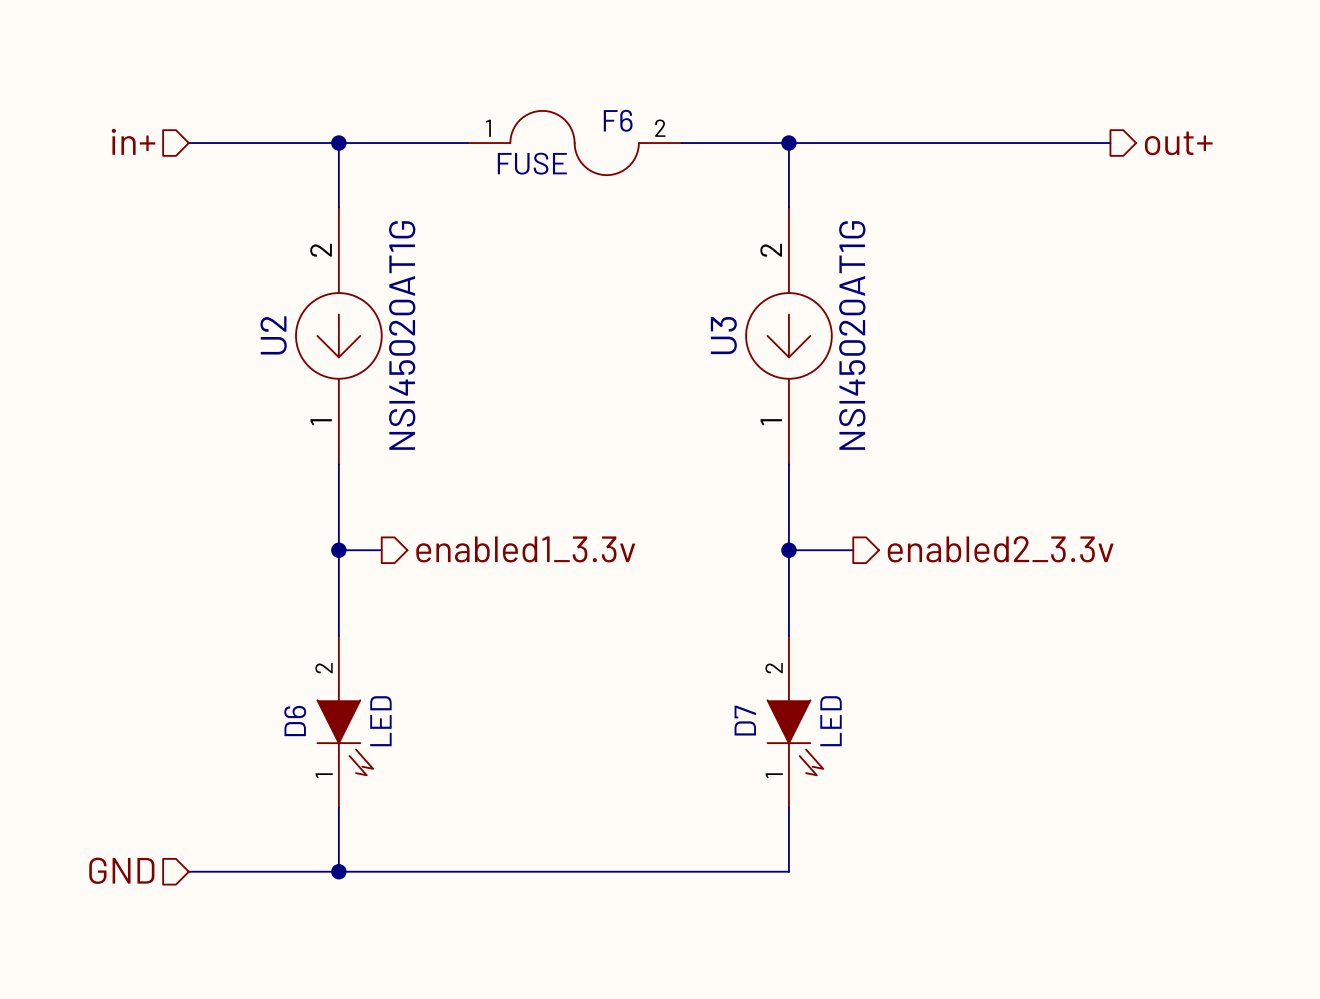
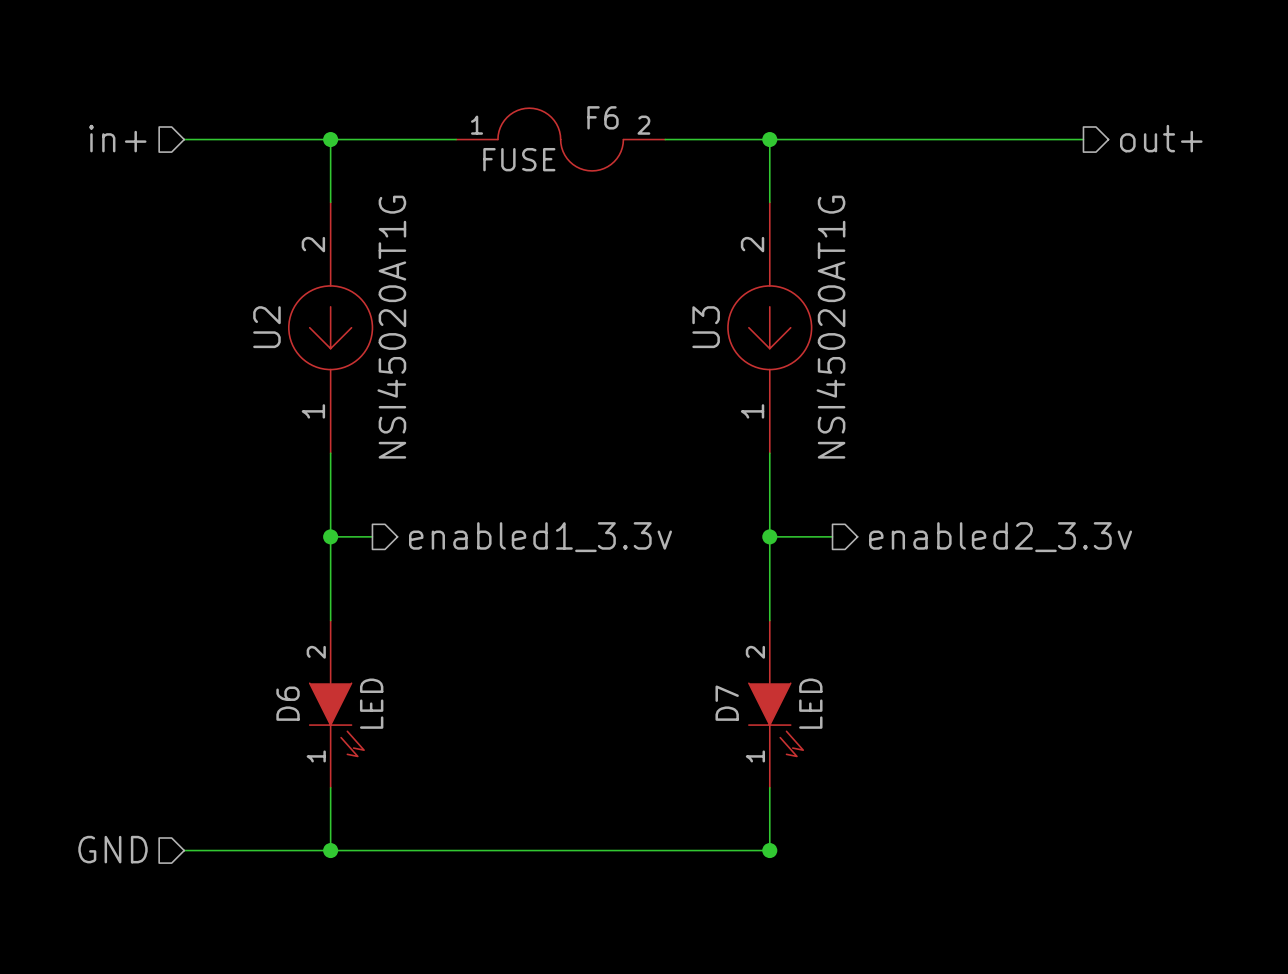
junction: none -> (769, 850)

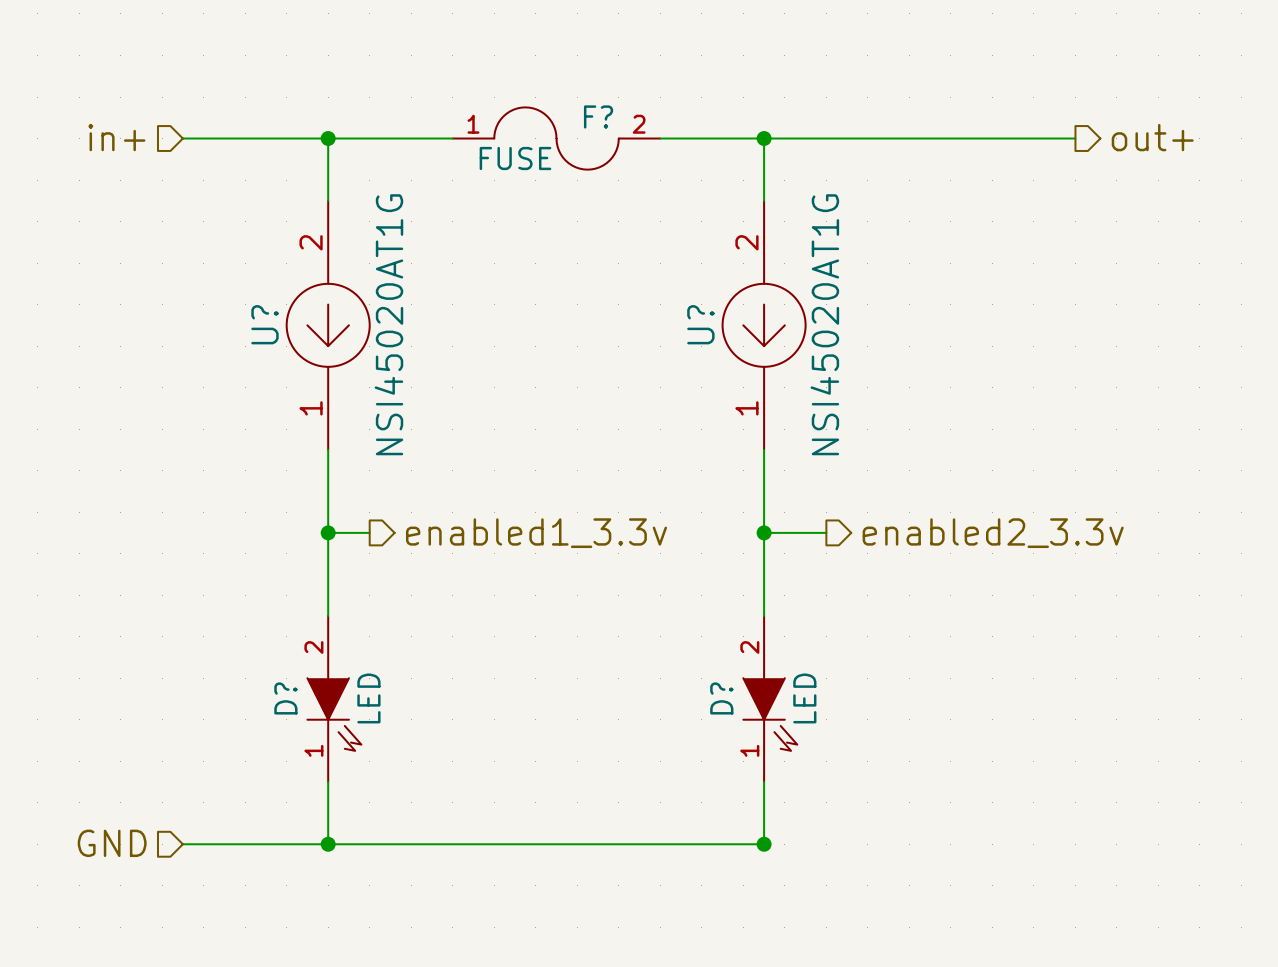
F6 name: F6 (602, 117) -> F? (598, 116)
U2 name: U2 (266, 327) -> U? (264, 324)
U3 name: U3 (706, 327) -> U? (700, 324)
D6 name: D6 (288, 703) -> D? (285, 698)
D7 name: D7 (727, 703) -> D? (721, 698)

